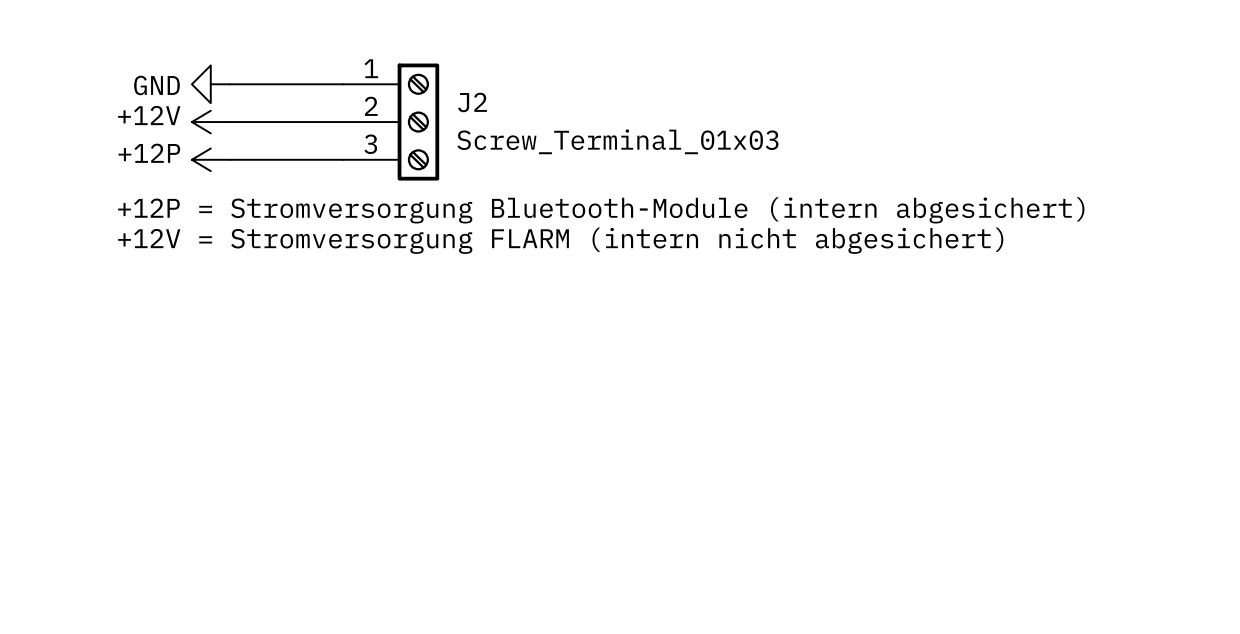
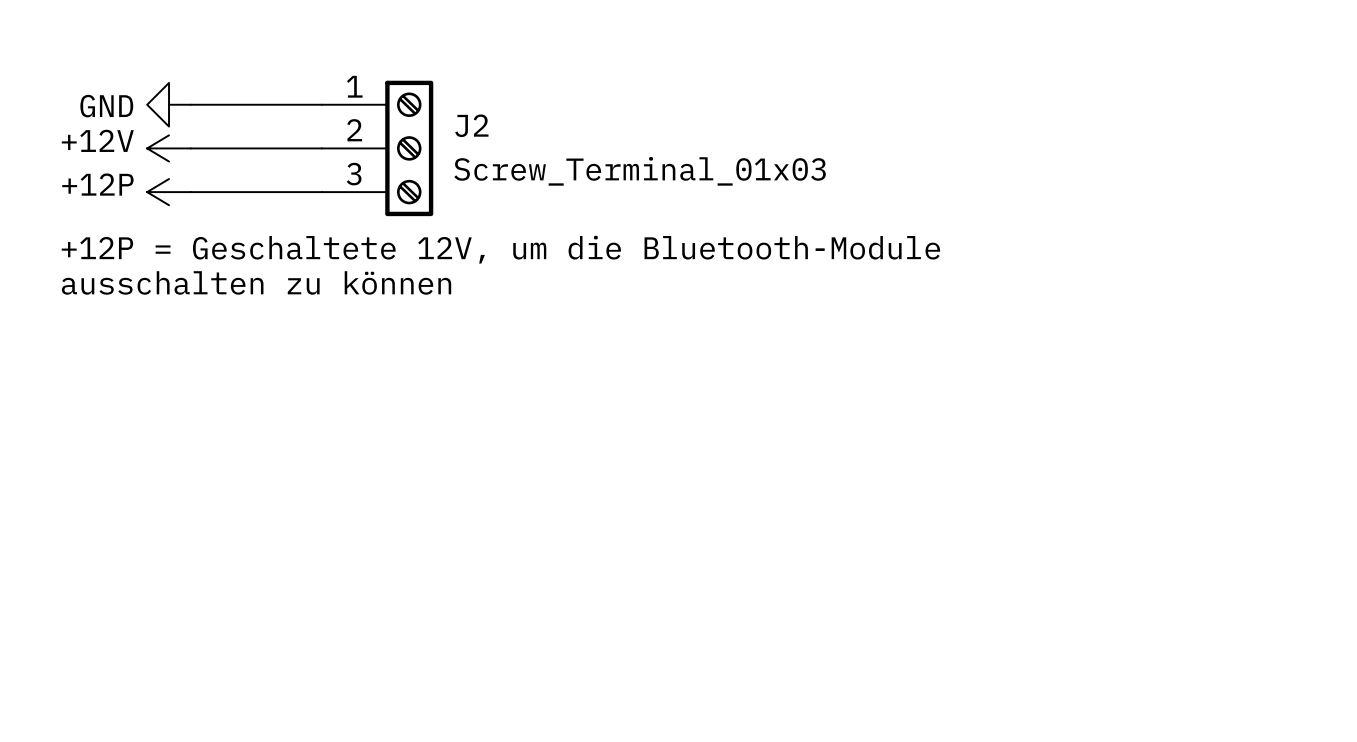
text: +12P = Stromversorgung Bluetooth-Module (intern abgesichert) (601, 210) -> +12P = Geschaltete 12V, um die Bluetooth-Module (500, 249)
text: +12V = Stromversorgung FLARM (intern nicht abgesichert) (560, 240) -> ausschalten zu können (256, 282)

